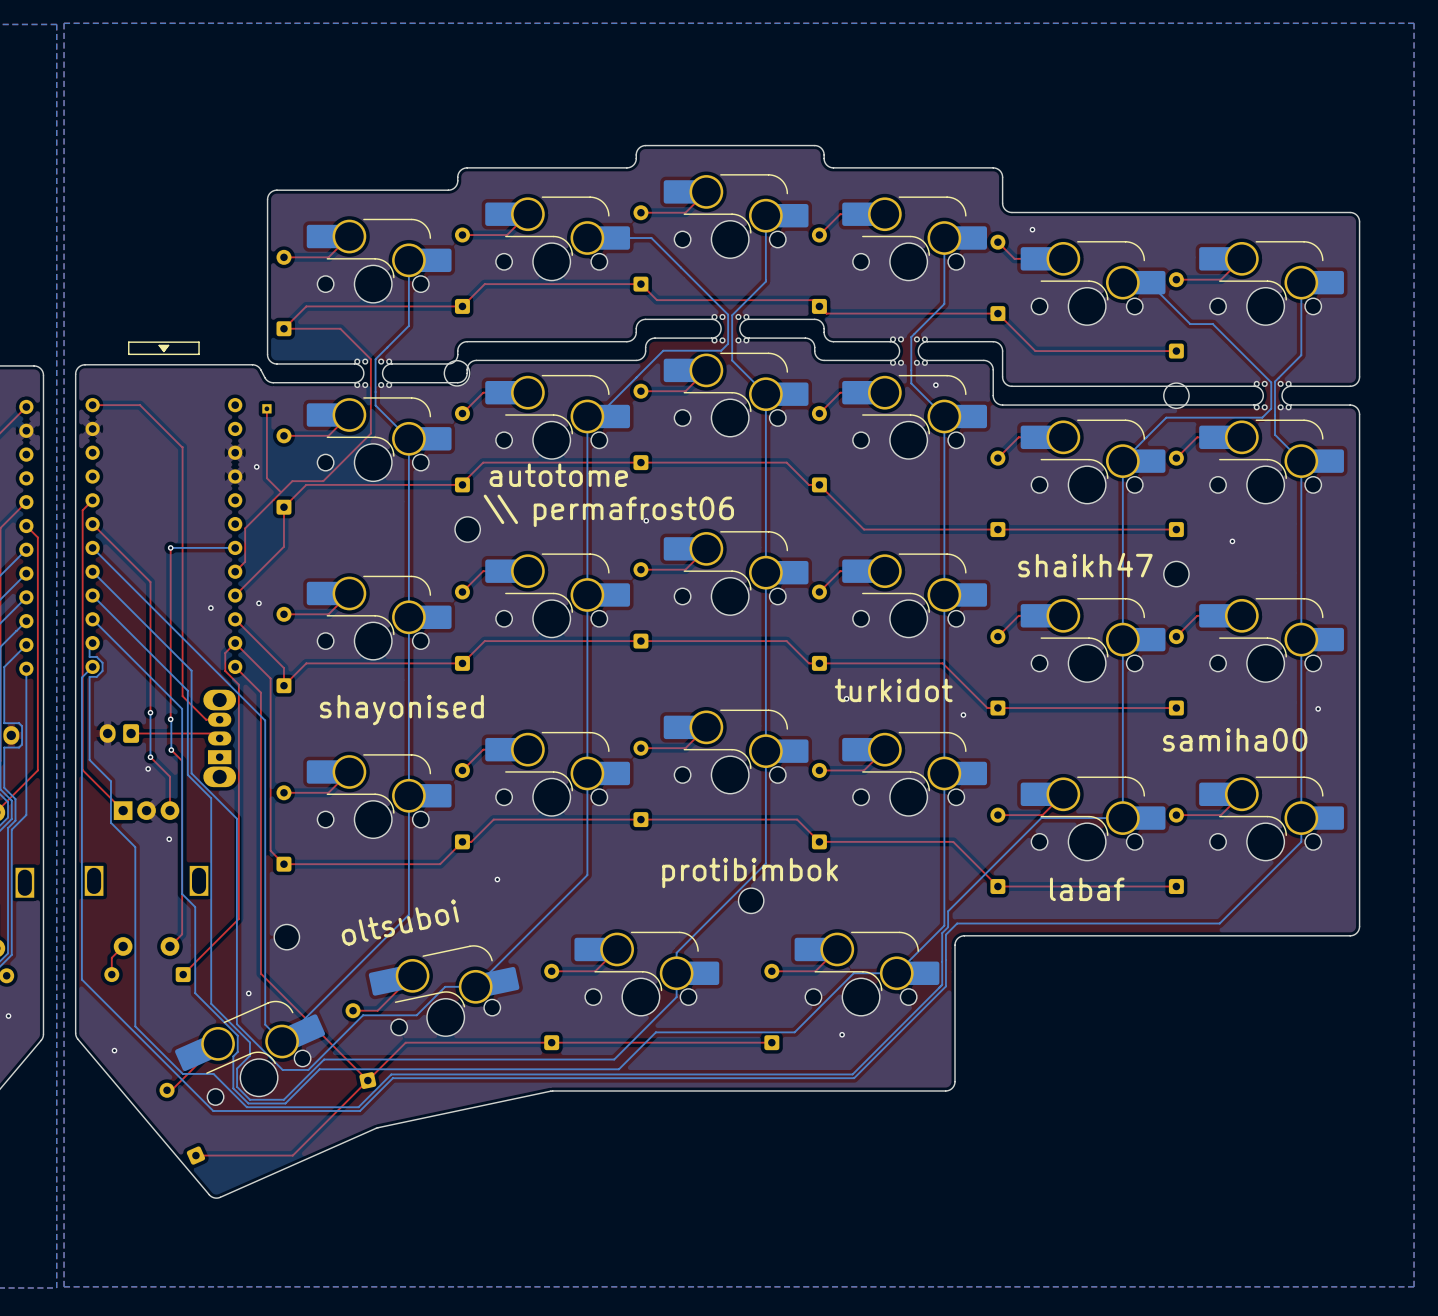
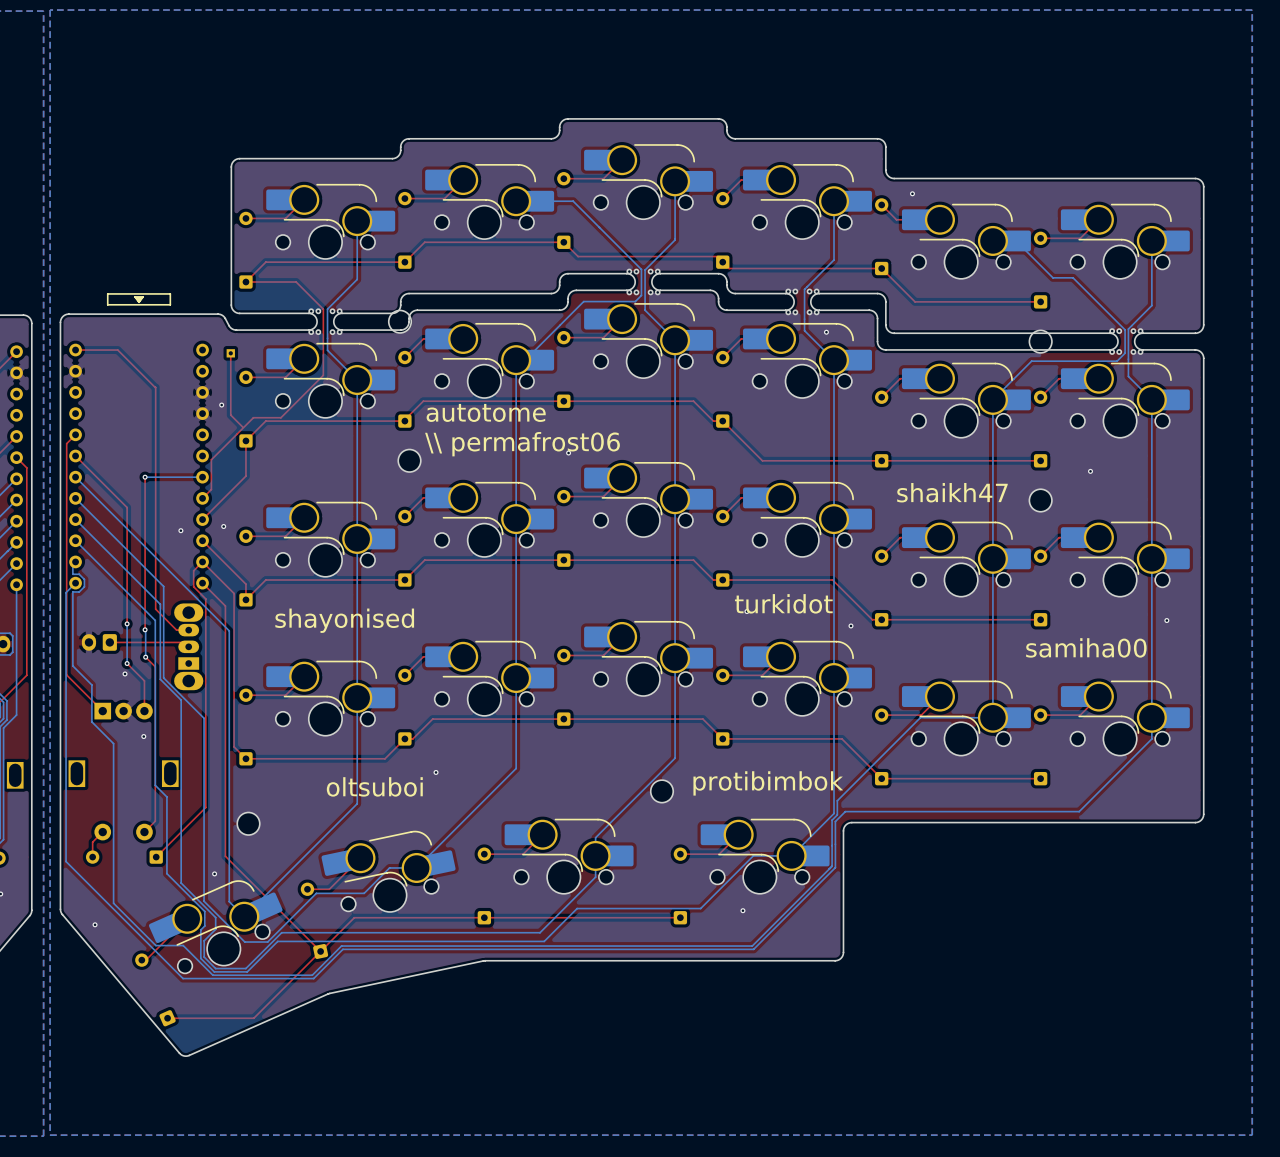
text position: protibimbok (750, 872) -> protibimbok (768, 783)
text: labaf (1087, 889) -> none
text rotation: 0° (400, 922) -> 11.9° clockwise (374, 786)

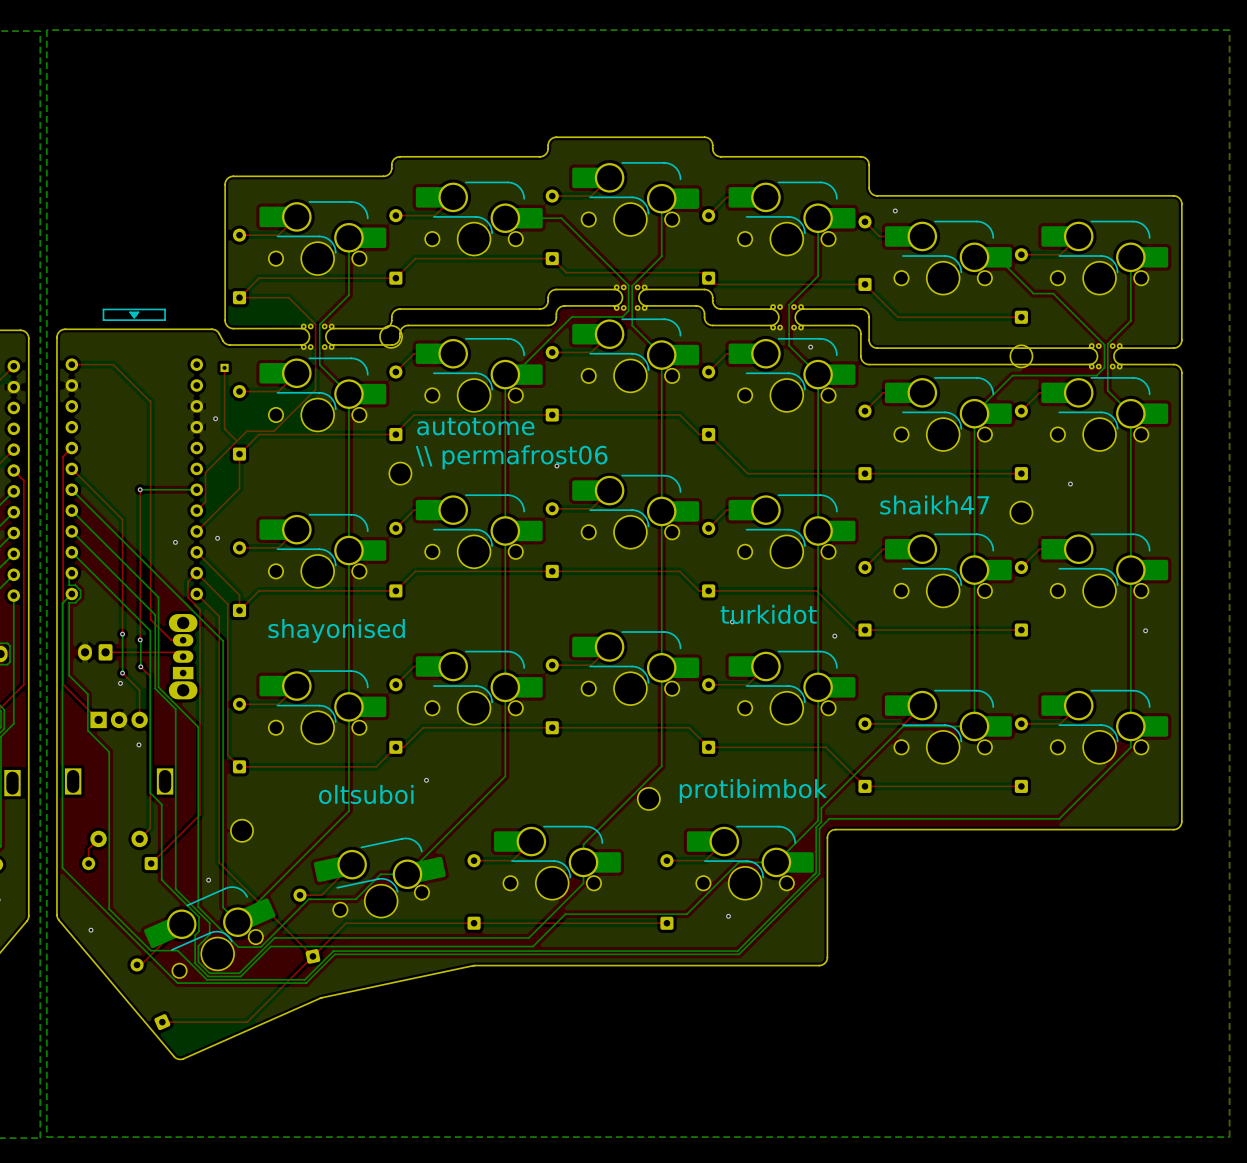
text: samiha00 (1086, 647) -> none

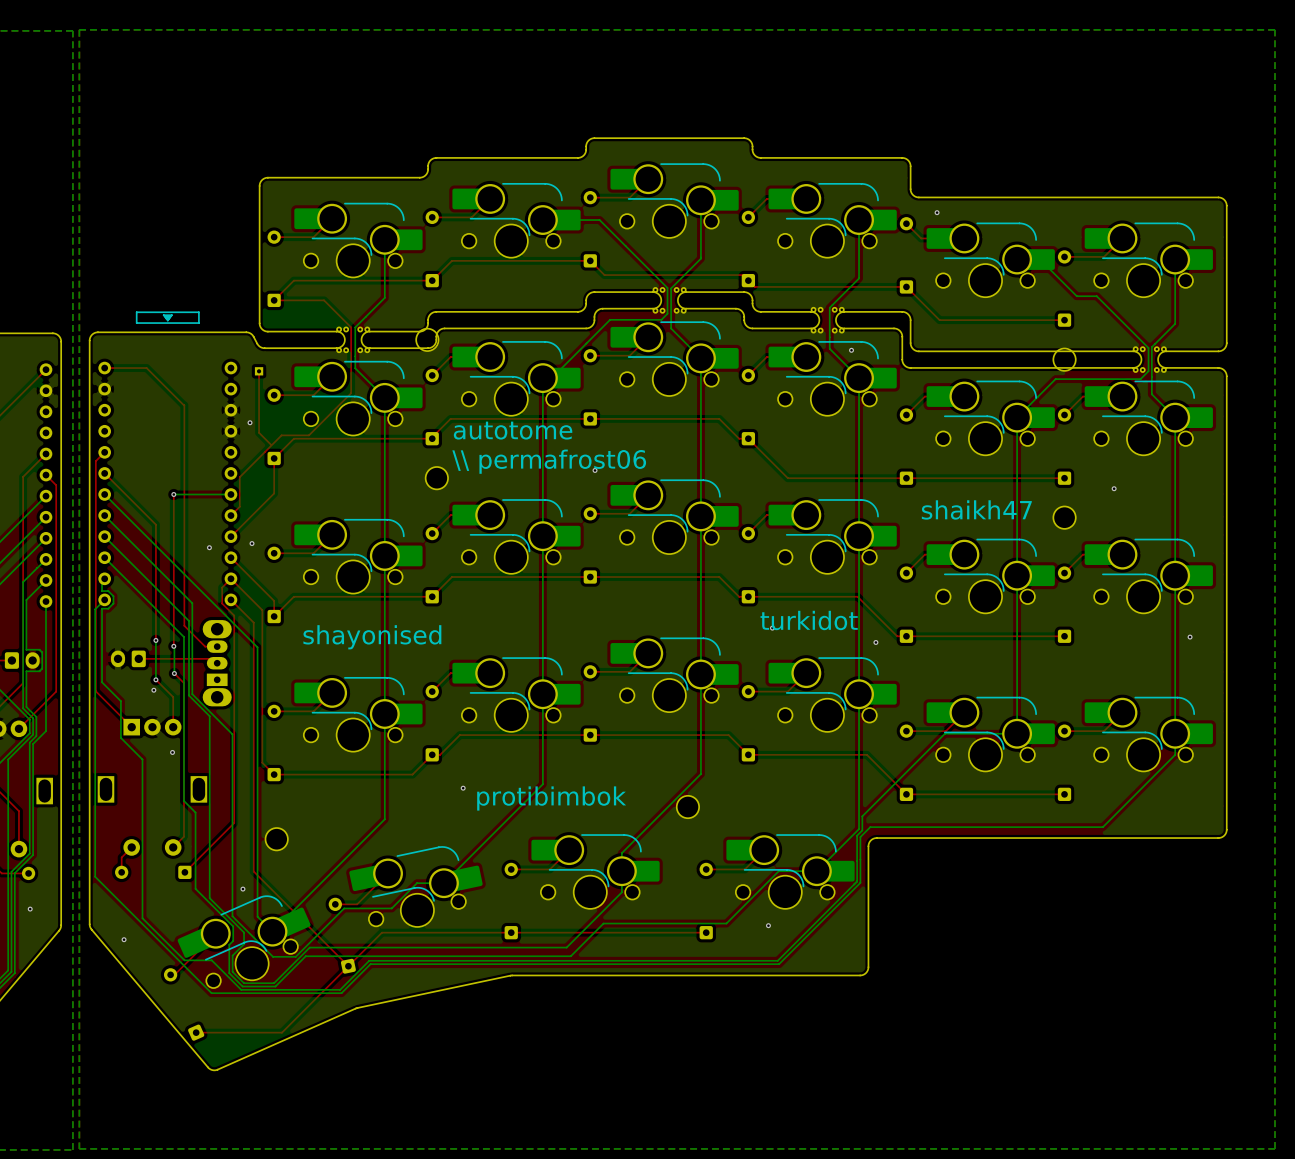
text: none -> protibimbok (551, 798)
text: protibimbok (753, 791) -> none
text: oltsuboi (366, 794) -> none

